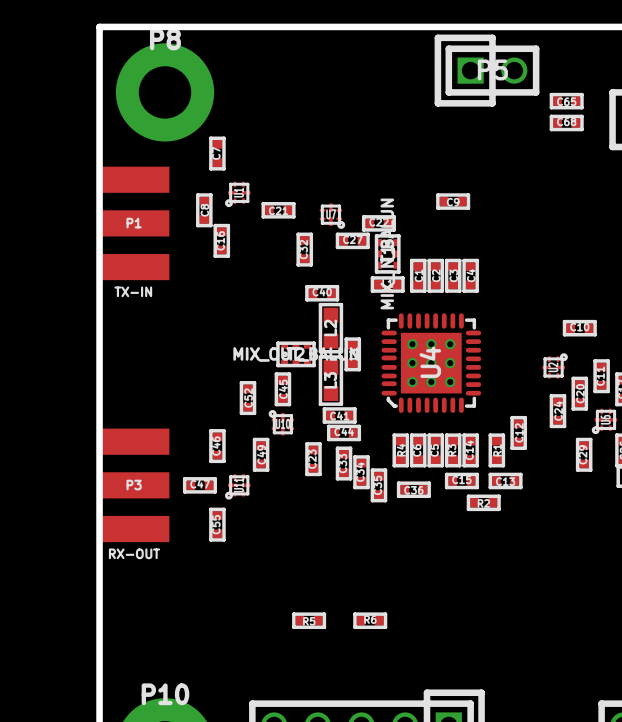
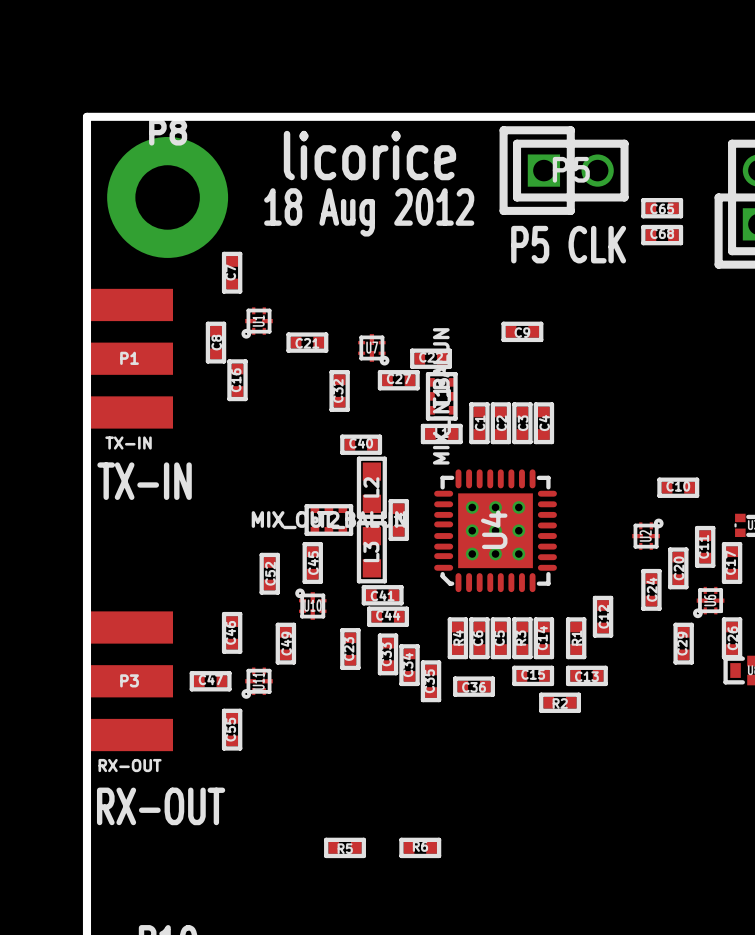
text: none -> licorice (369, 155)
text: none -> 18 Aug 2012 (369, 212)
text: none -> P5 CLK (568, 244)
text: none -> TX-IN (144, 481)
text: none -> RX-OUT (161, 806)

